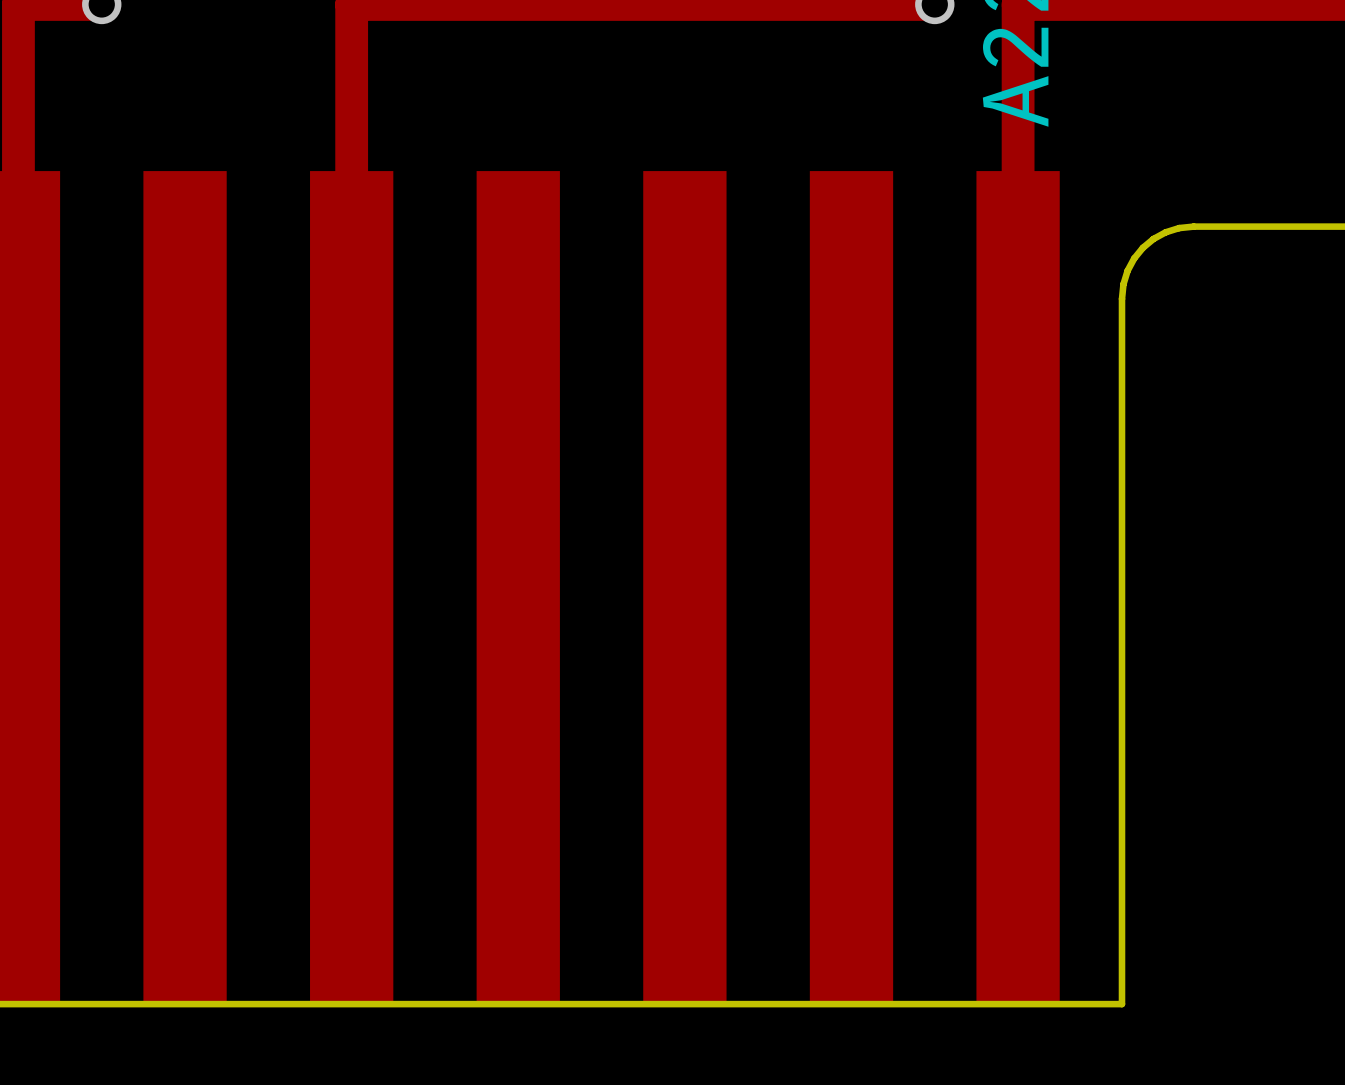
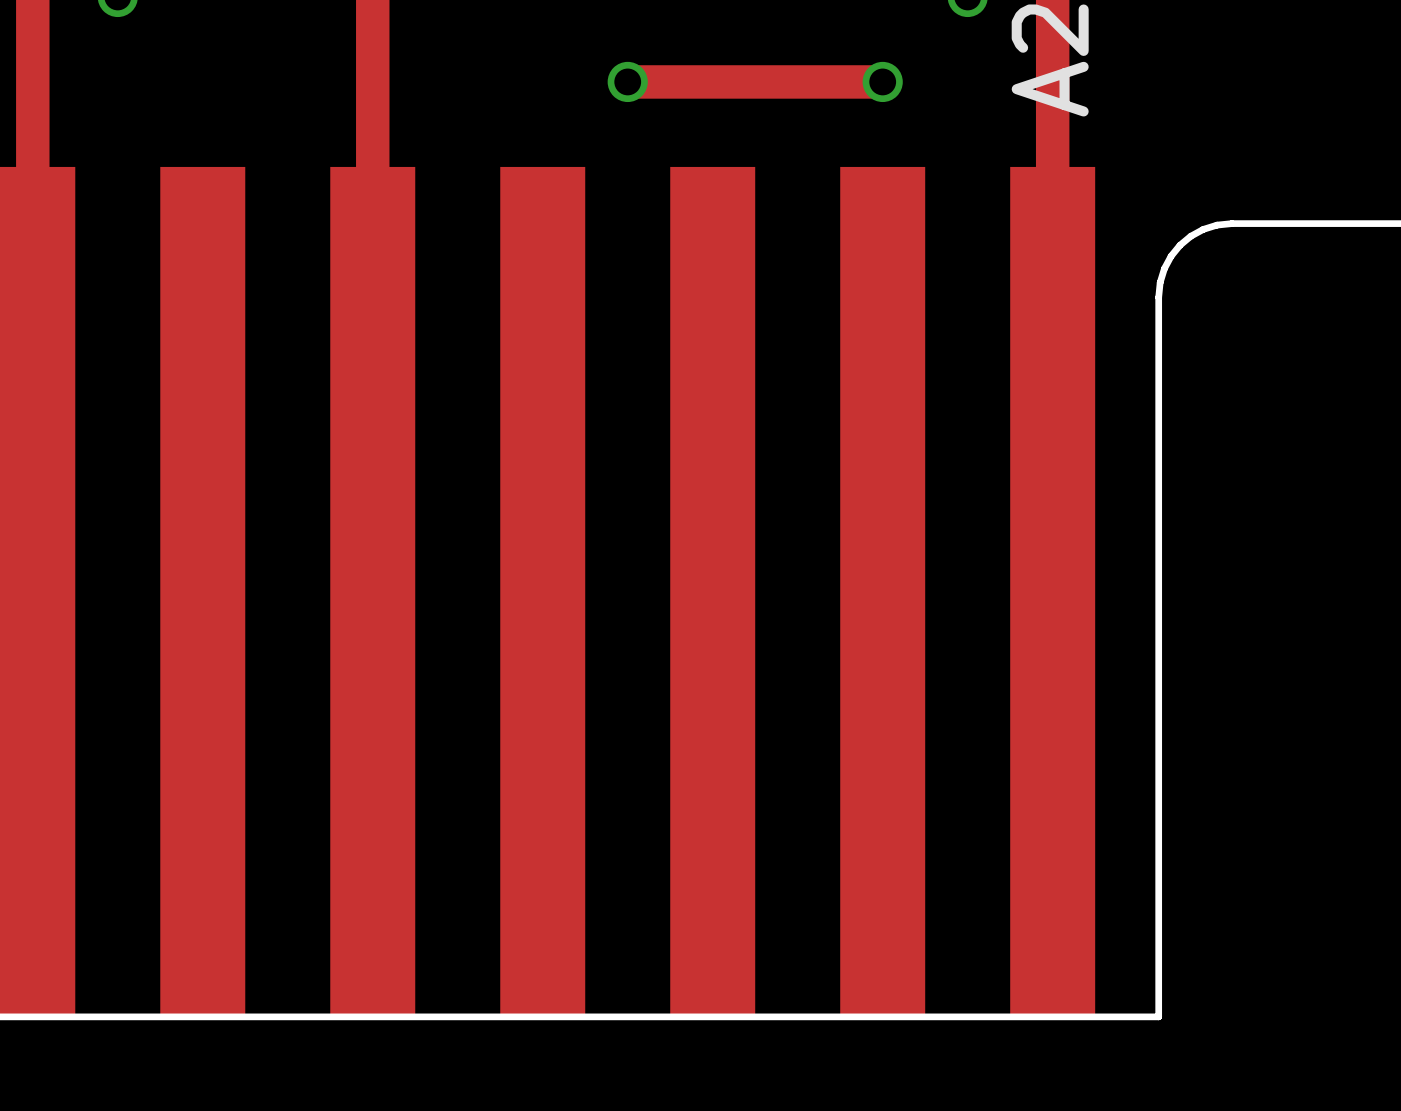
track: none -> (627, 81) (882, 81)
via: none -> (627, 81)
via: none -> (882, 81)

